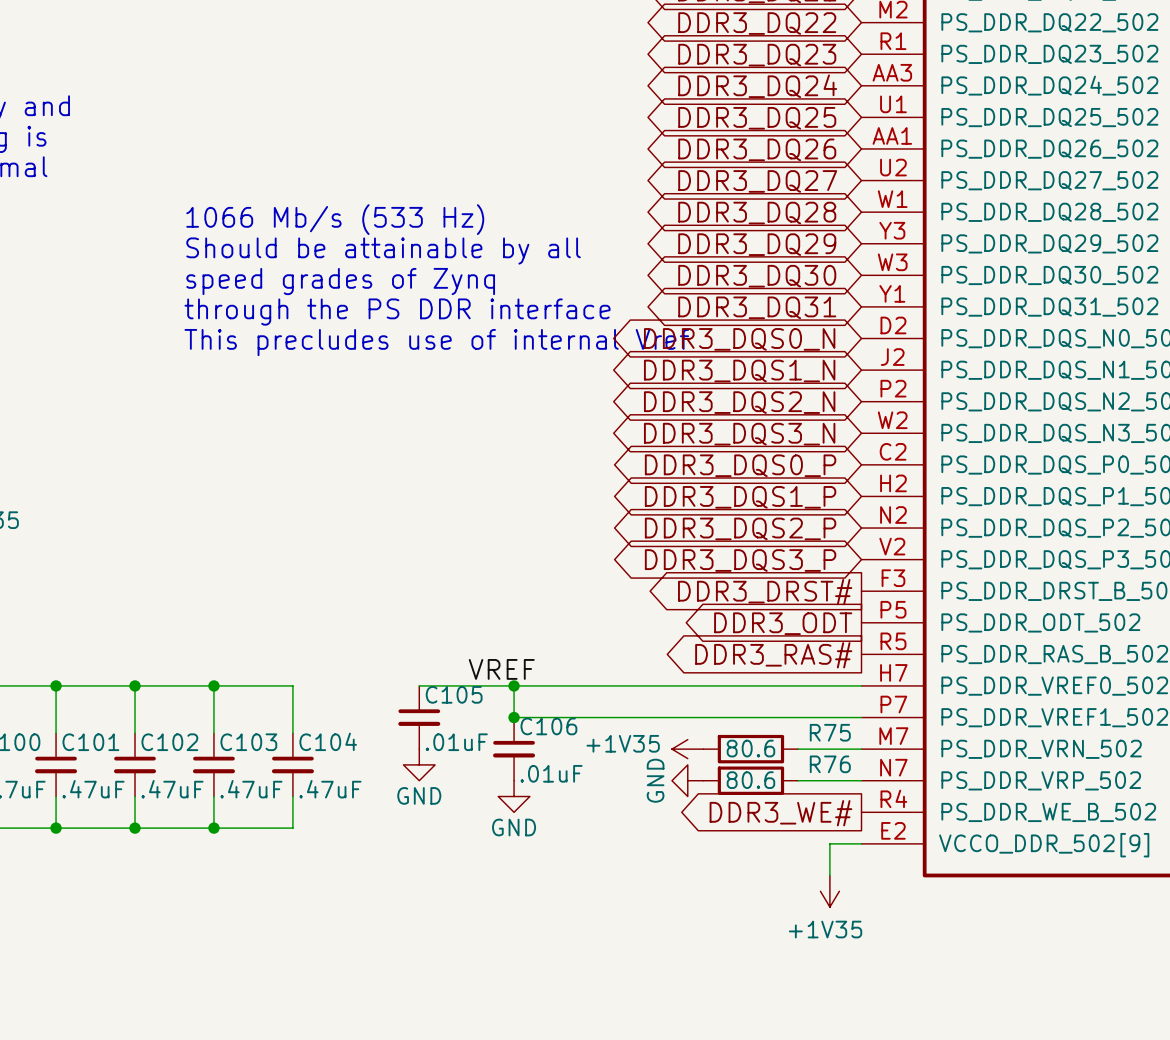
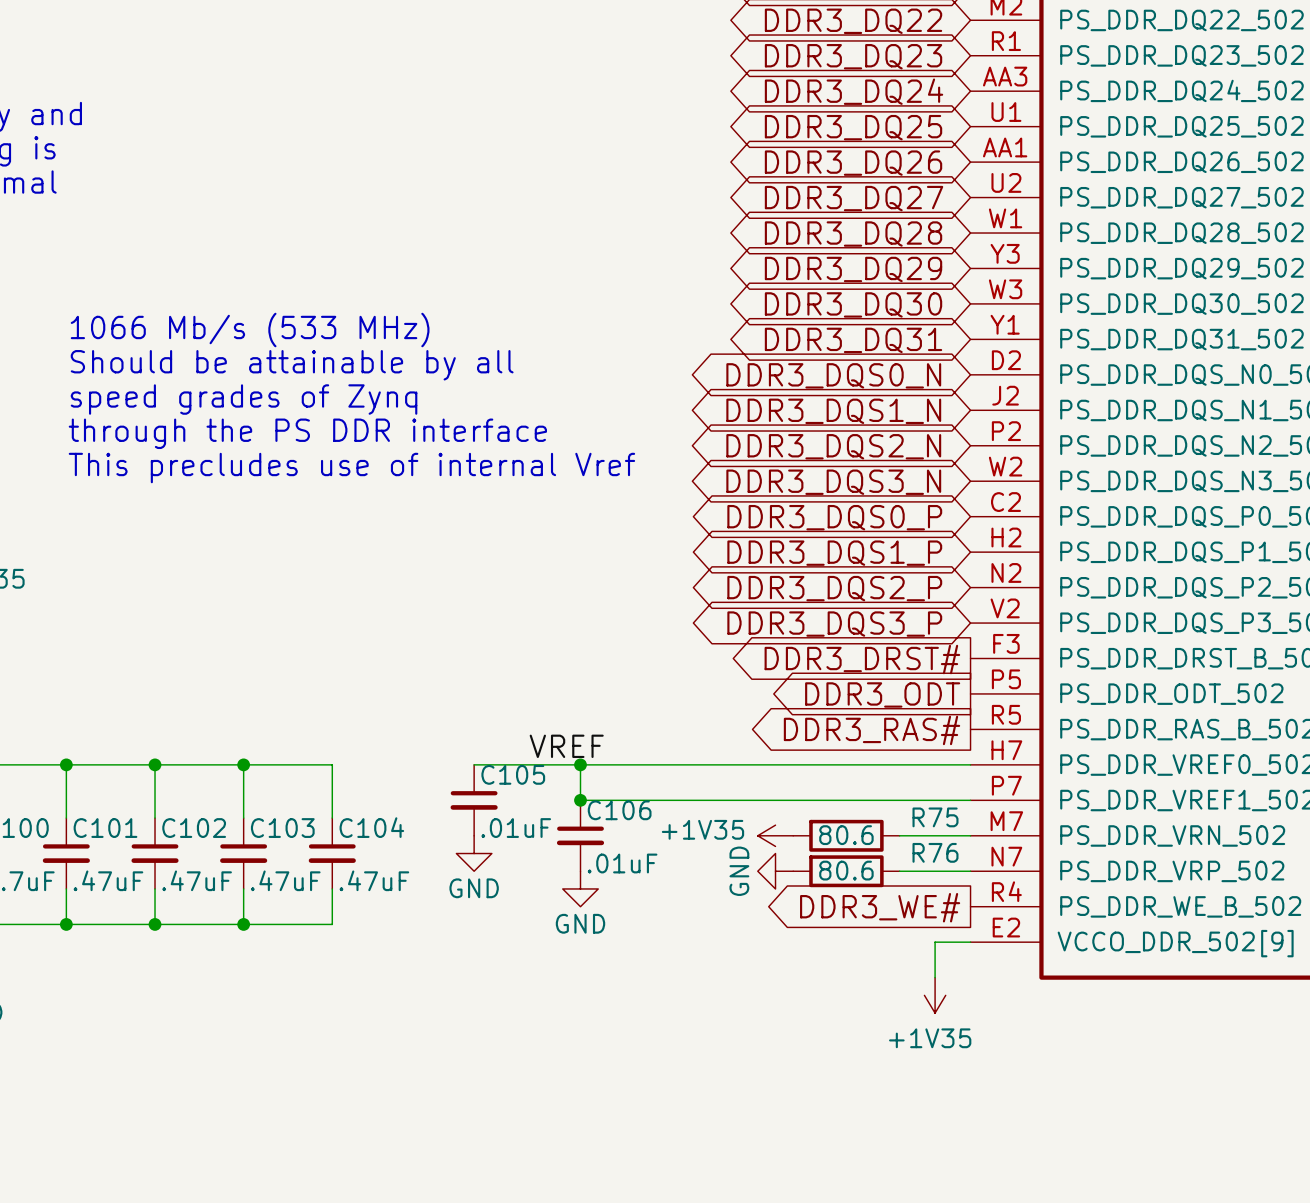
text: 1066 Mb/s (533 Hz) (335, 219) -> none
text position: Should be attainable by all (383, 251) -> Should be attainable by all (292, 365)
text position: speed grades of Zynq (340, 281) -> speed grades of Zynq (244, 399)
text: none -> 1066 Mb/s (533 MHz) (250, 330)
text position: through the PS DDR interface (397, 312) -> through the PS DDR interface (307, 433)
text position: This precludes use of internal Vref (436, 342) -> This precludes use of internal Vref (351, 468)

